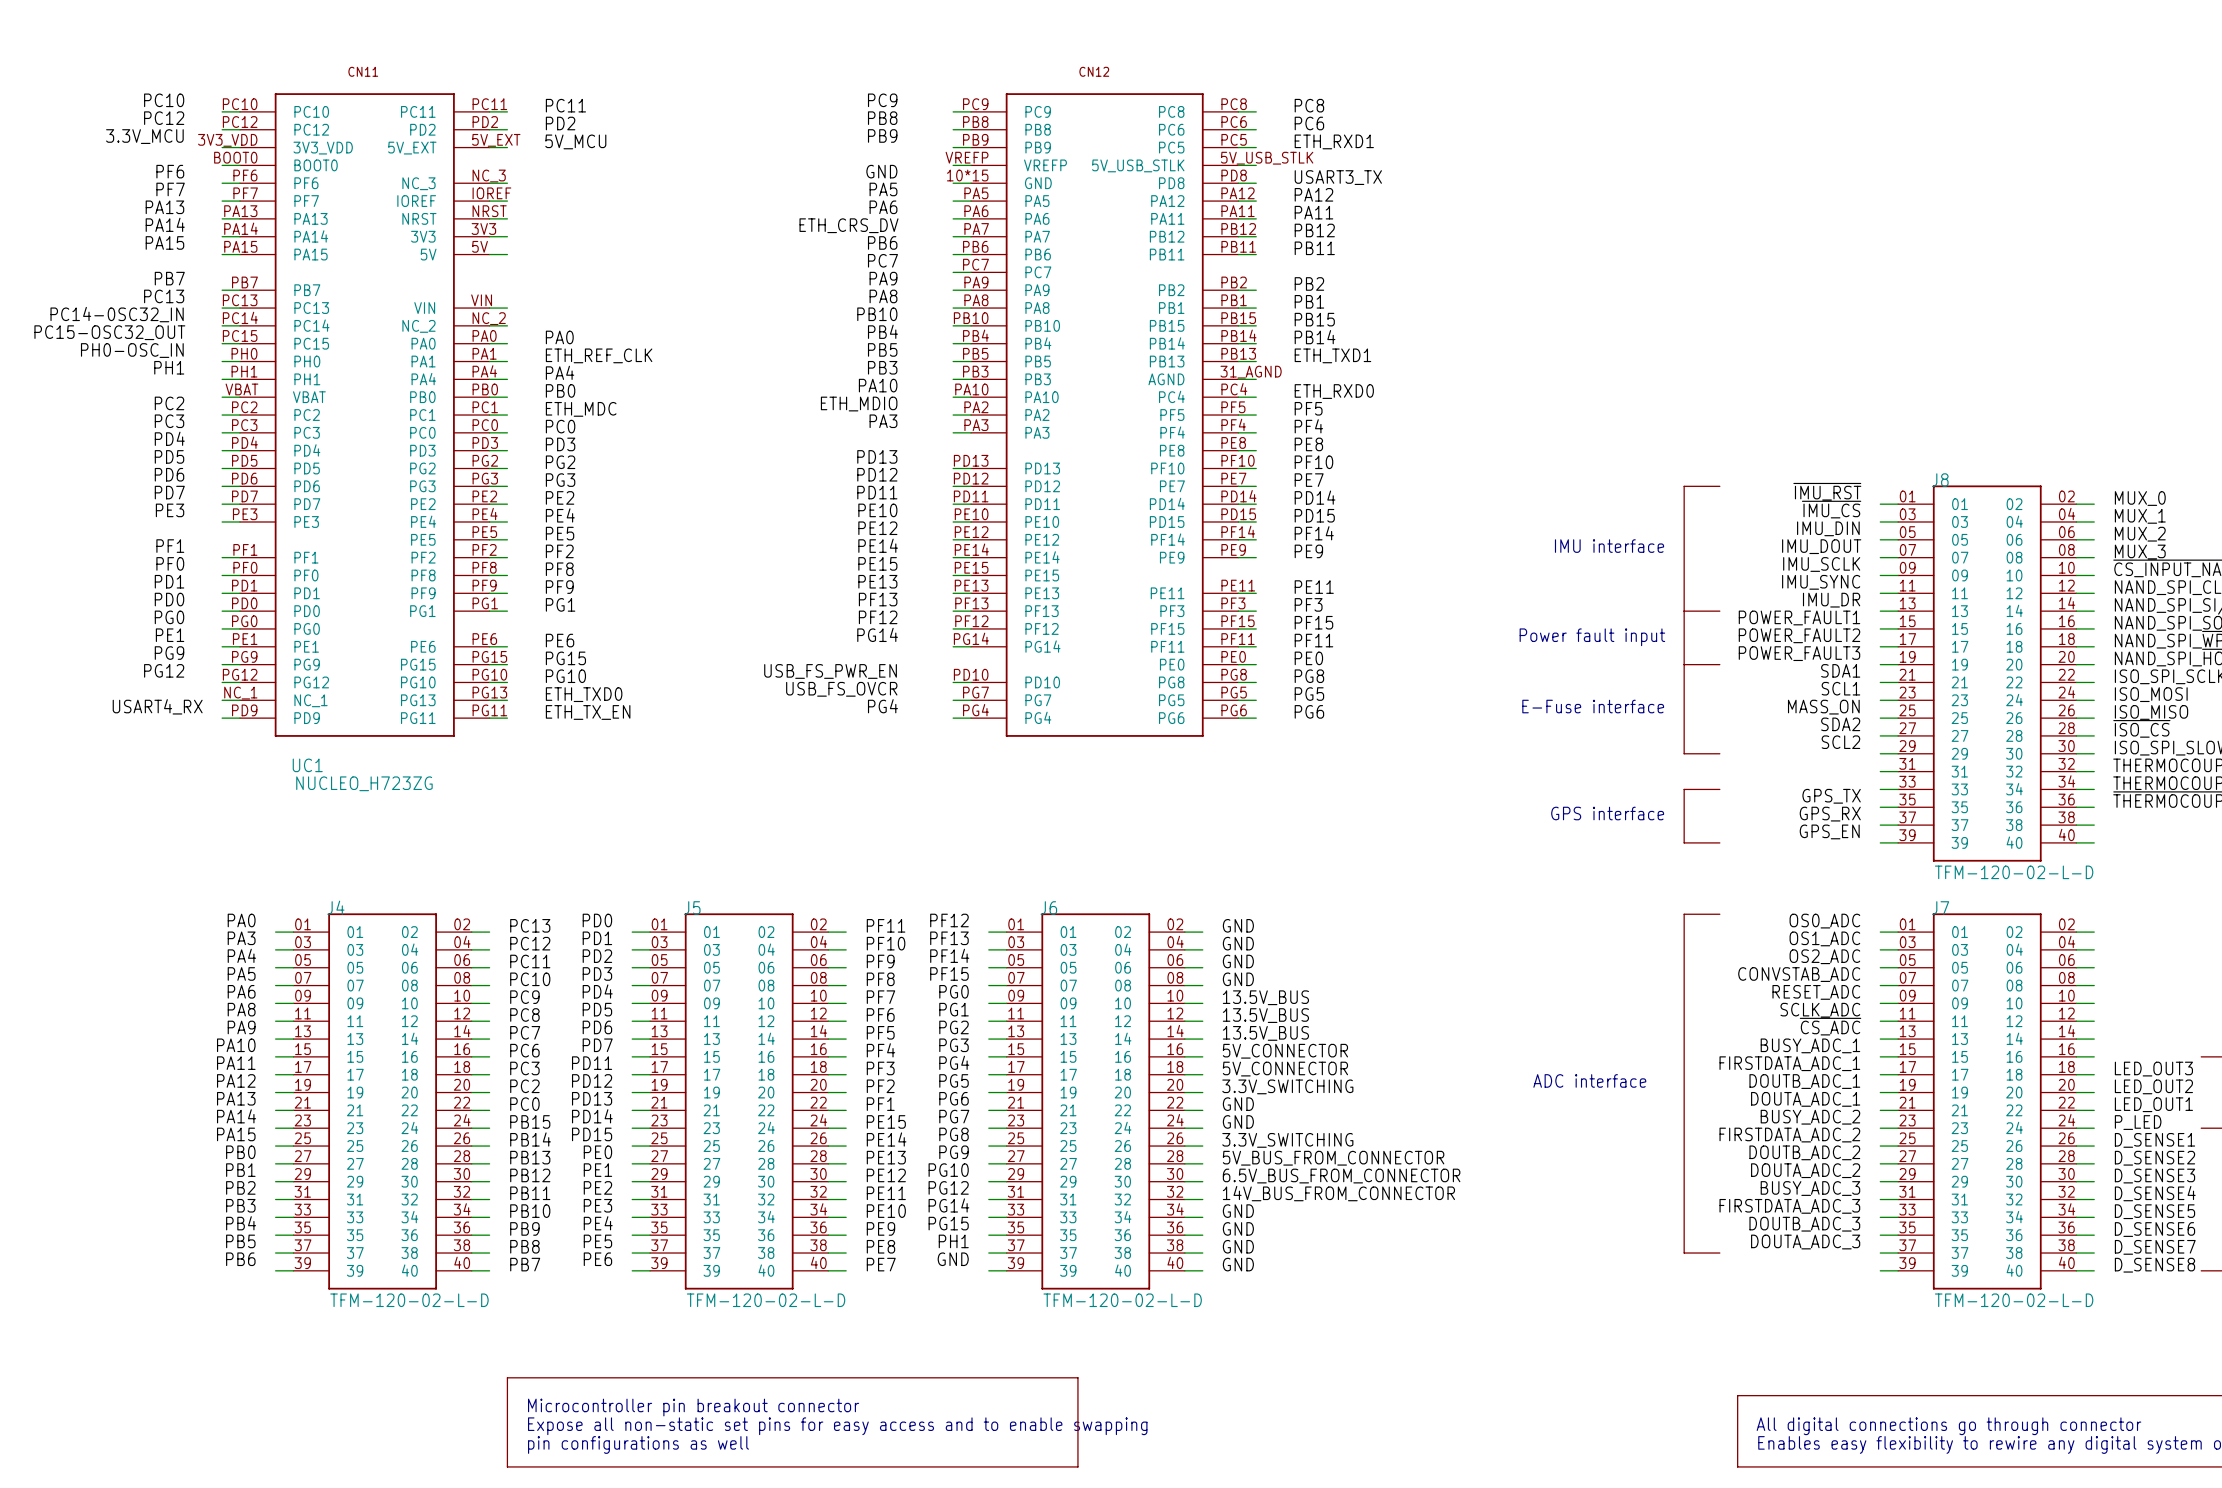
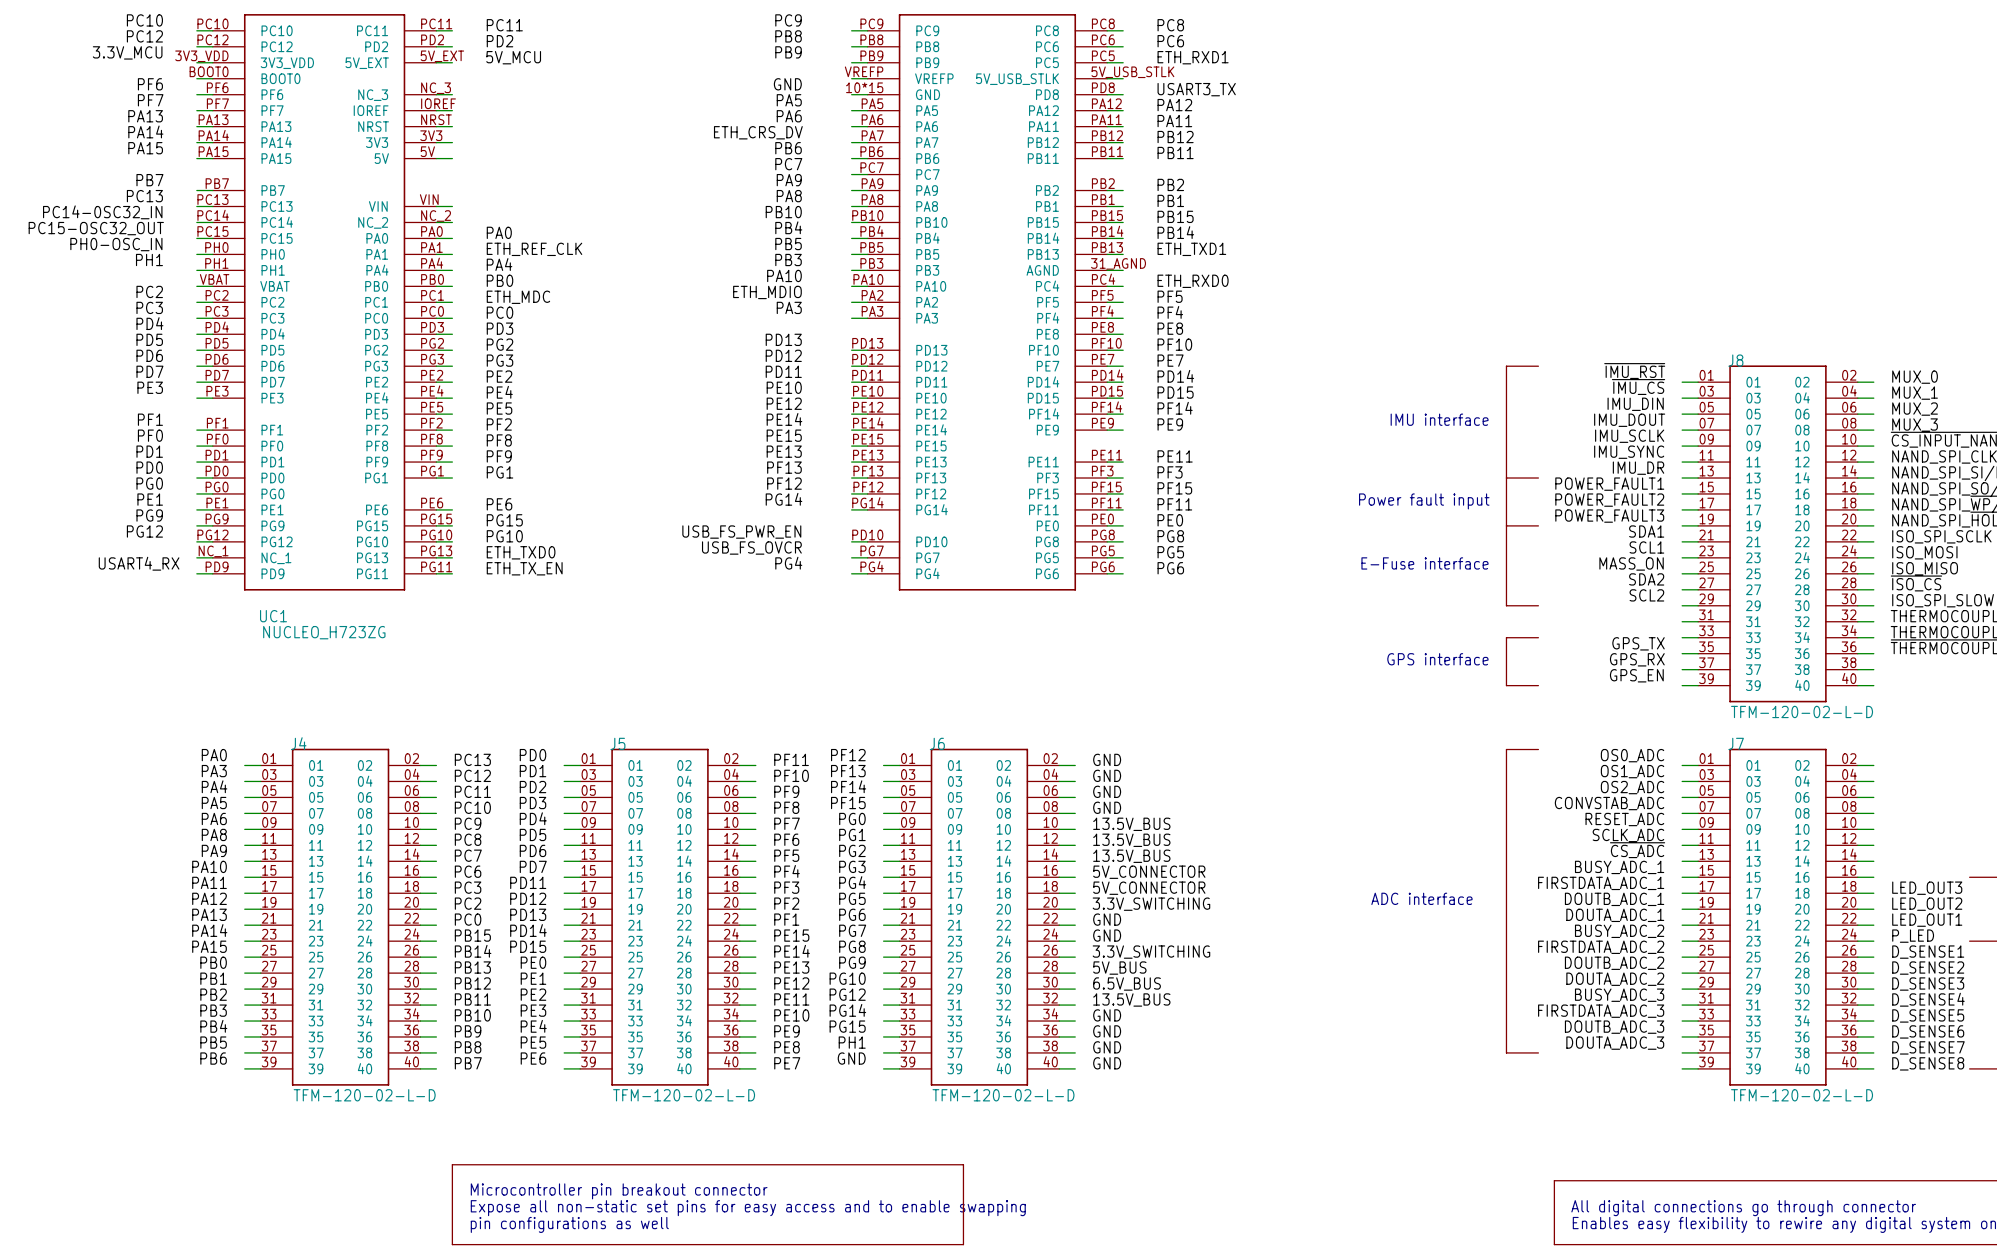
label: 5V_BUS_FROM_CONNECTOR (1333, 1158) -> 5V_BUS (1119, 968)
label: 6.5V_BUS_FROM_CONNECTOR (1341, 1176) -> 6.5V_BUS (1127, 984)
label: 14V_BUS_FROM_CONNECTOR (1338, 1193) -> 13.5V_BUS (1131, 999)

